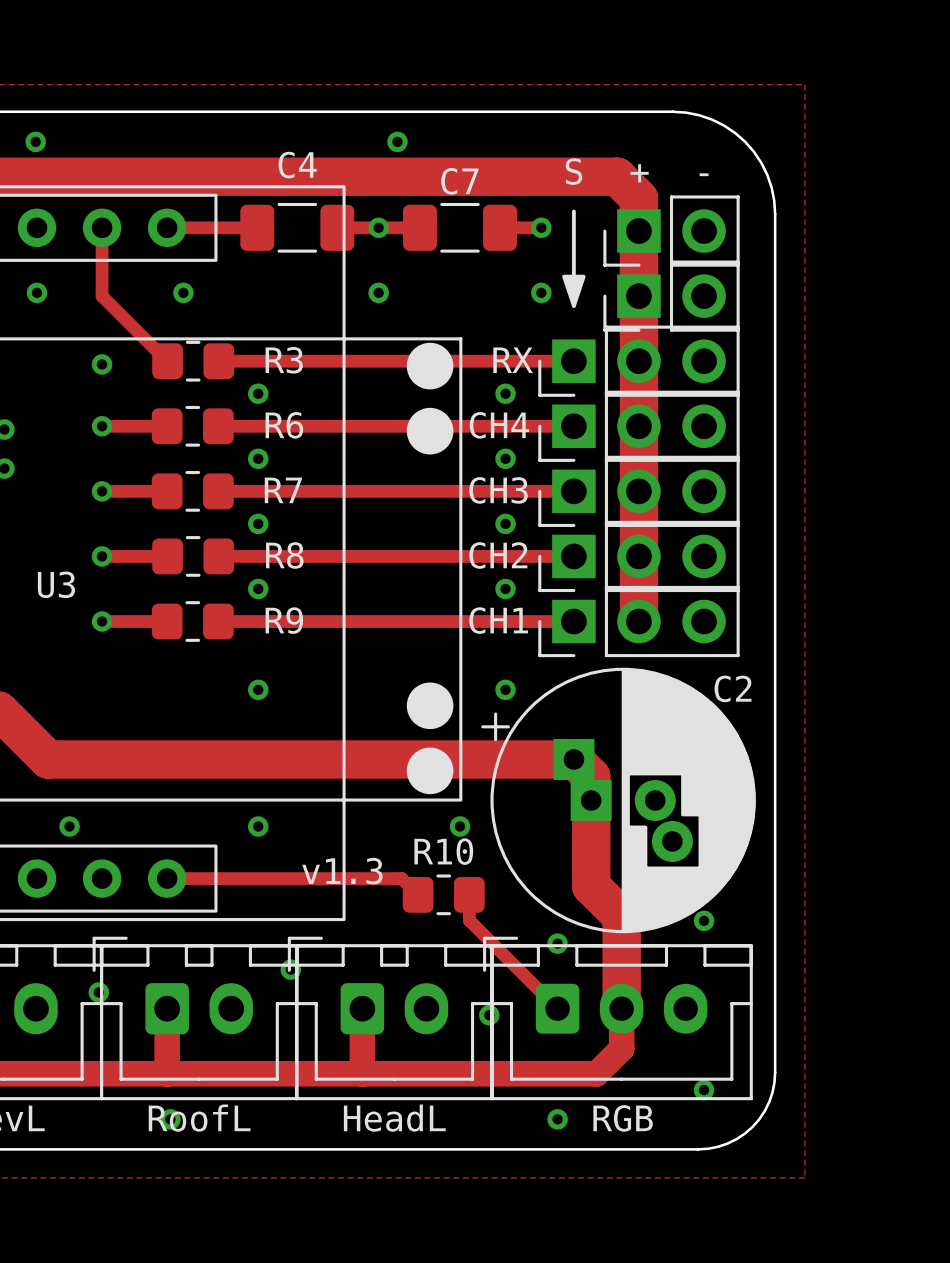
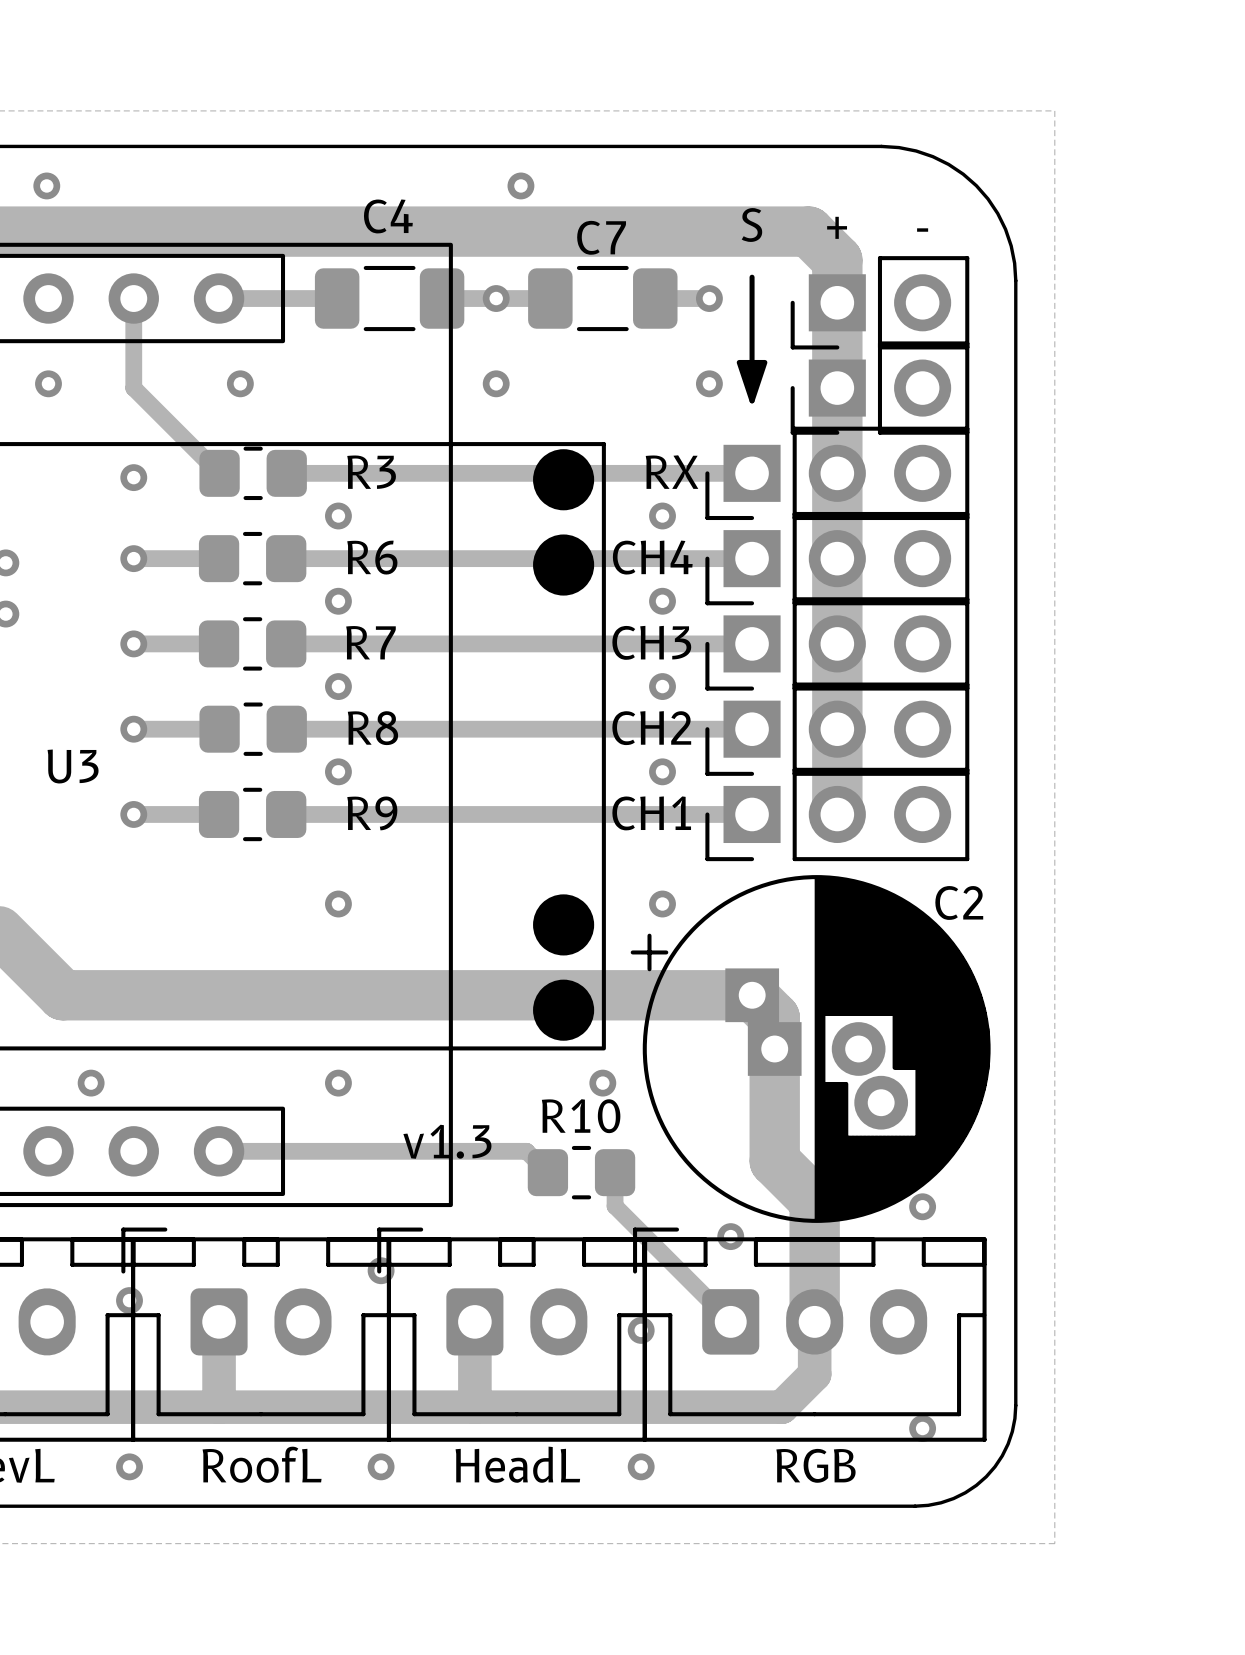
via: none -> (129, 1466)
via: (170, 1119) -> none
via: none -> (381, 1466)
via position: (557, 1119) -> (641, 1466)

